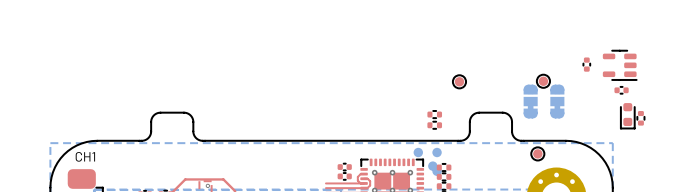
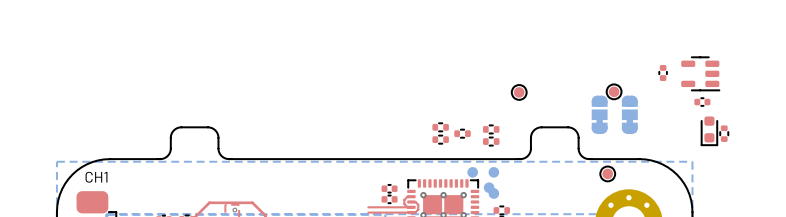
part: none -> (440, 127)
part: none -> (462, 133)
part: none -> (440, 139)
part: (444, 167) -> none
part: (444, 176) -> none

